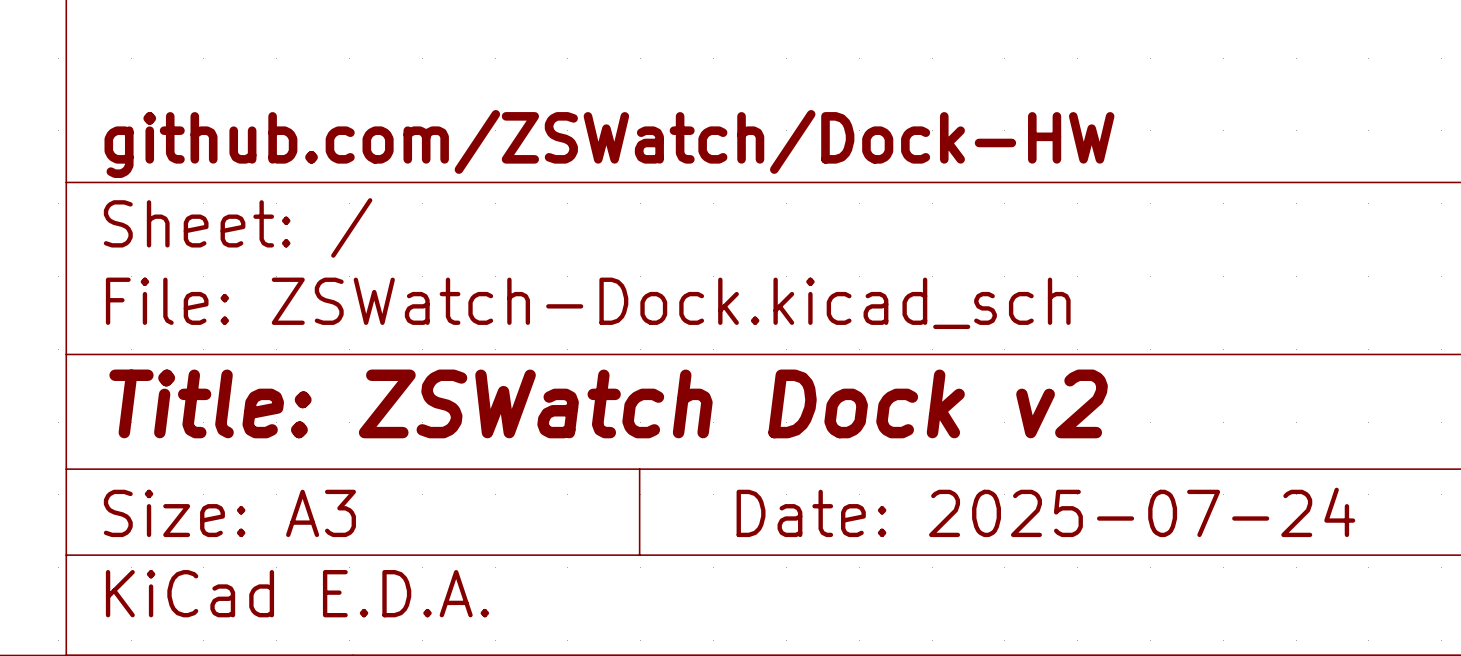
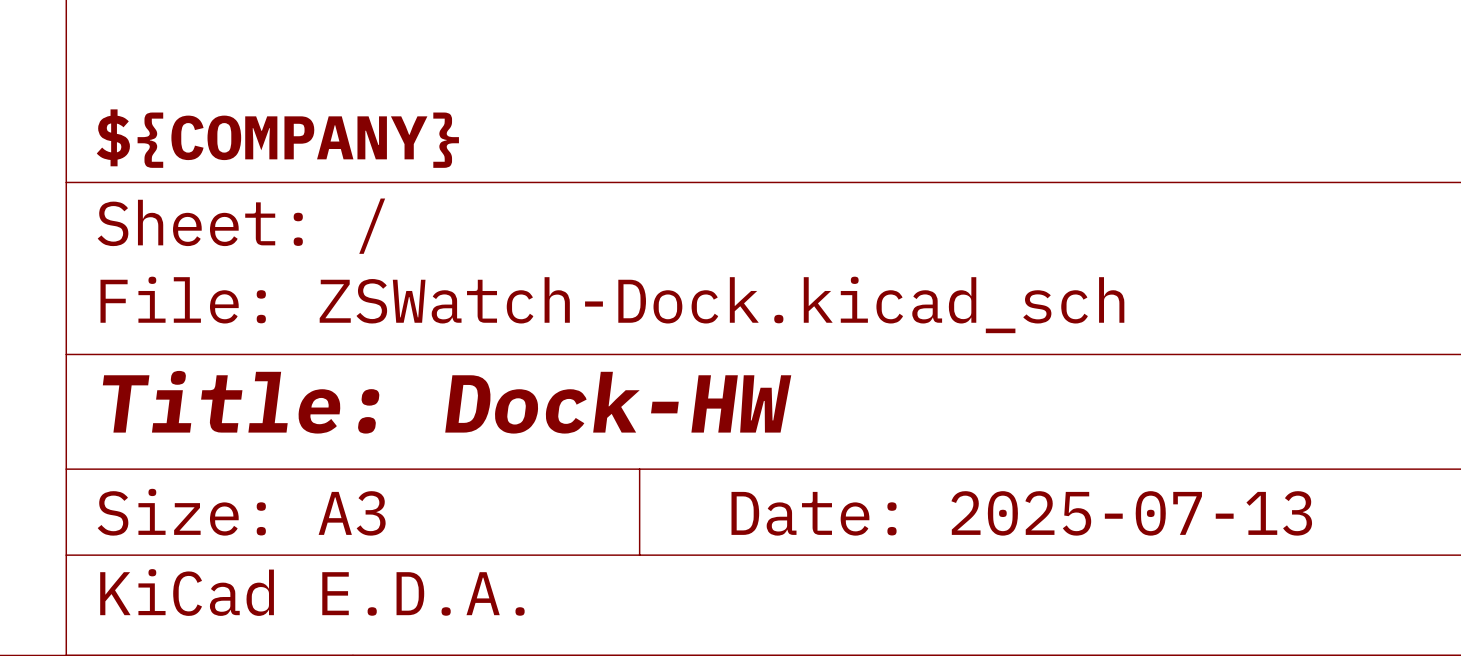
title block: github.com/ZSWatch/Dock-HW (609, 143) -> ${COMPANY} (277, 138)
title block: Title: ZSWatch Dock v2 (608, 403) -> Title: Dock-HW (447, 402)
title block: Date: 2025-07-24 (1045, 512) -> Date: 2025-07-13 (1021, 513)

